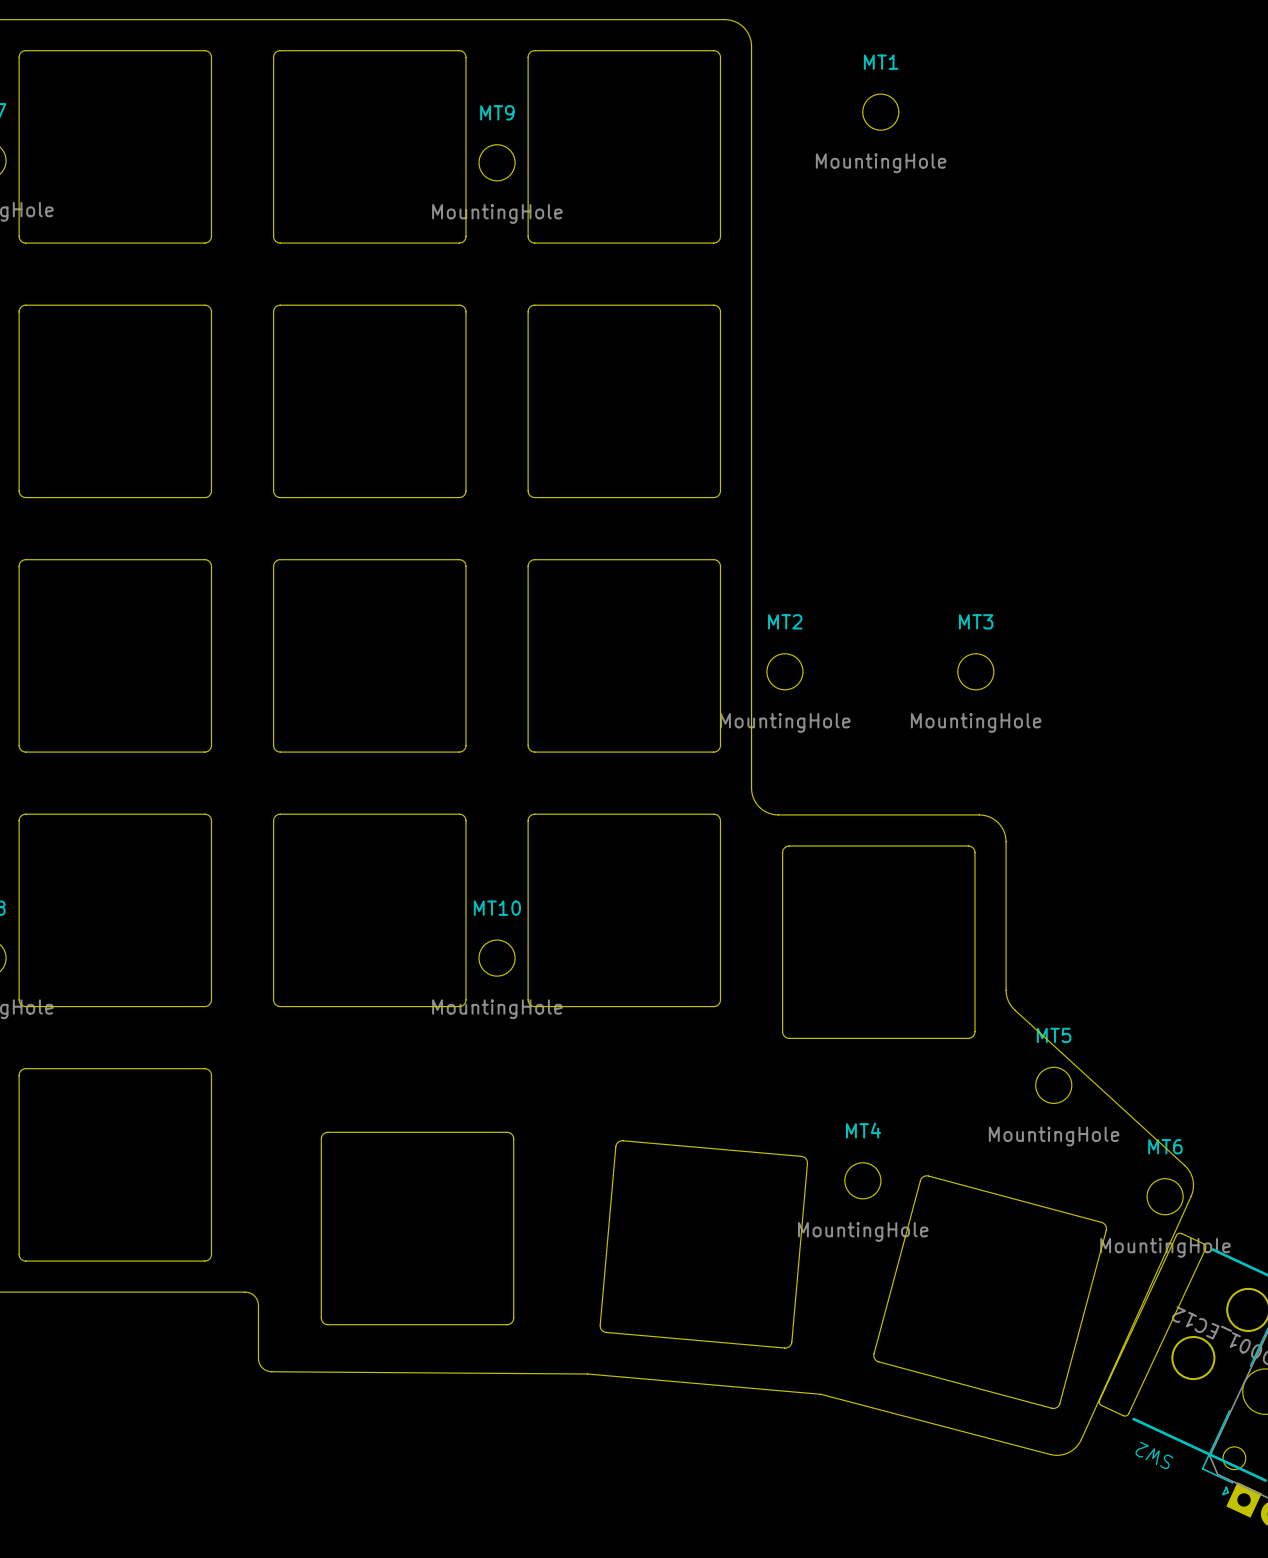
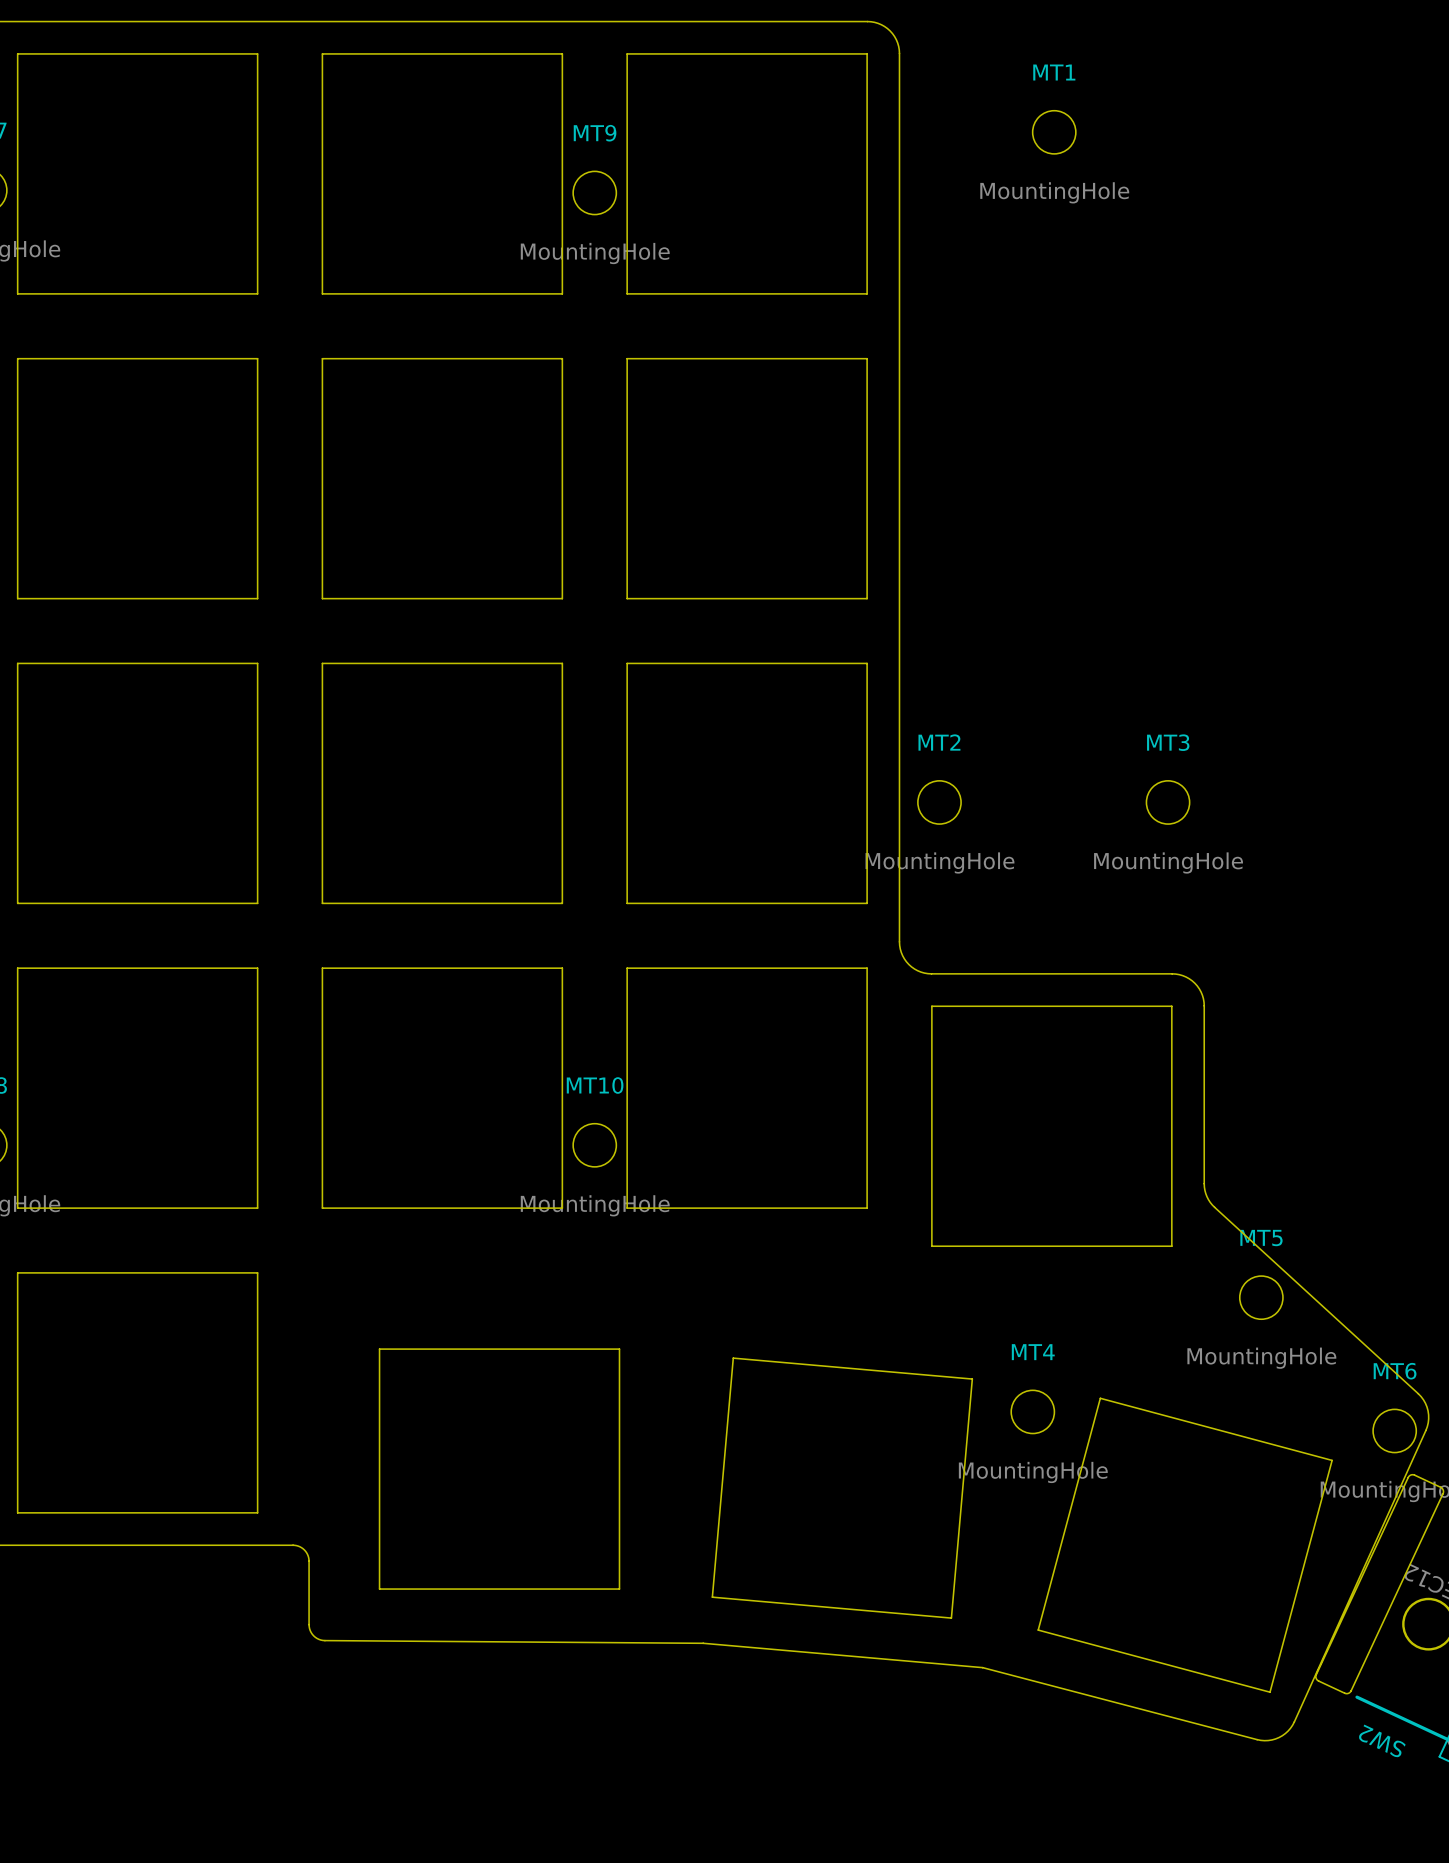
drawing shape: [18, 50, 212, 244] -> [17, 53, 259, 295]
drawing shape: [273, 50, 467, 244] -> [322, 53, 563, 295]
drawing shape: [527, 50, 721, 244] -> [626, 53, 868, 295]
drawing shape: [18, 304, 212, 498] -> [17, 358, 259, 600]
drawing shape: [273, 304, 467, 498] -> [322, 358, 563, 600]
drawing shape: [527, 304, 721, 498] -> [626, 358, 868, 600]
drawing shape: [18, 559, 212, 753] -> [17, 663, 259, 904]
drawing shape: [273, 559, 467, 753] -> [322, 663, 563, 904]
drawing shape: [527, 559, 721, 753] -> [626, 663, 868, 904]
drawing shape: [18, 813, 212, 1007] -> [17, 967, 259, 1209]
drawing shape: [273, 813, 467, 1007] -> [322, 967, 563, 1209]
drawing shape: [527, 813, 721, 1007] -> [626, 967, 868, 1209]
drawing shape: [782, 845, 976, 1039] -> [931, 1005, 1173, 1247]
drawing shape: [18, 1068, 212, 1262] -> [17, 1272, 259, 1514]
drawing shape: [321, 1131, 515, 1326] -> [379, 1348, 620, 1590]
drawing shape: [599, 1140, 808, 1349] -> [711, 1357, 973, 1619]
drawing shape: [873, 1175, 1107, 1409] -> [1037, 1397, 1333, 1693]

